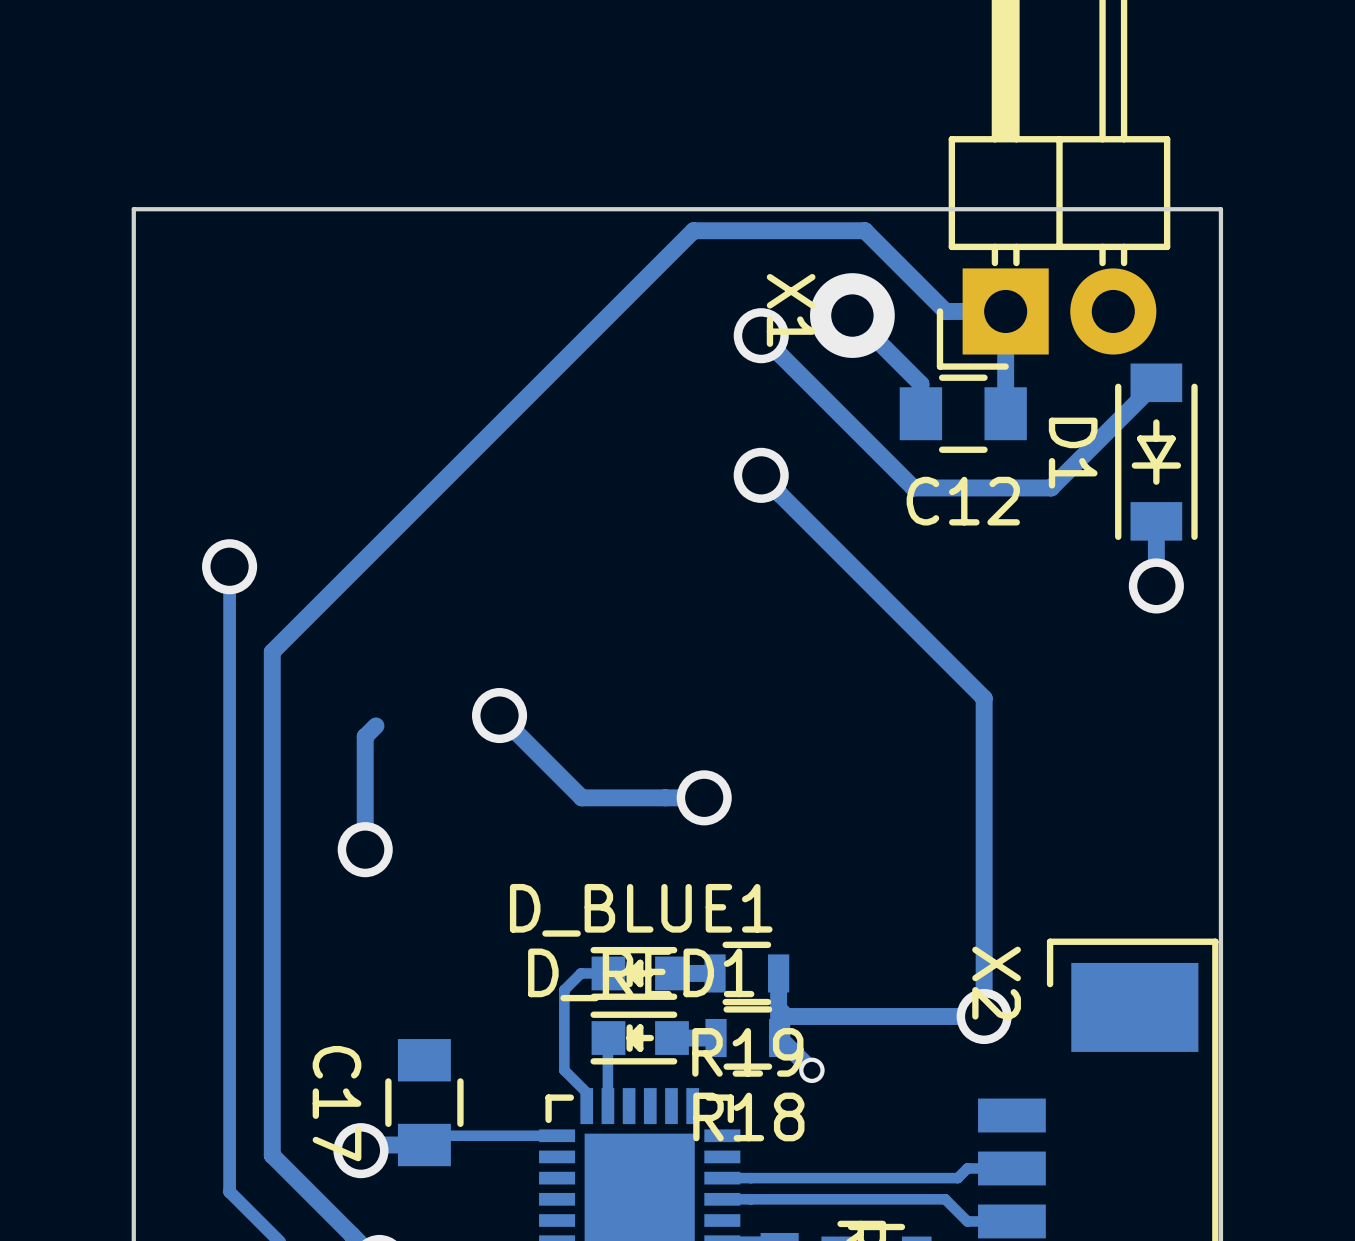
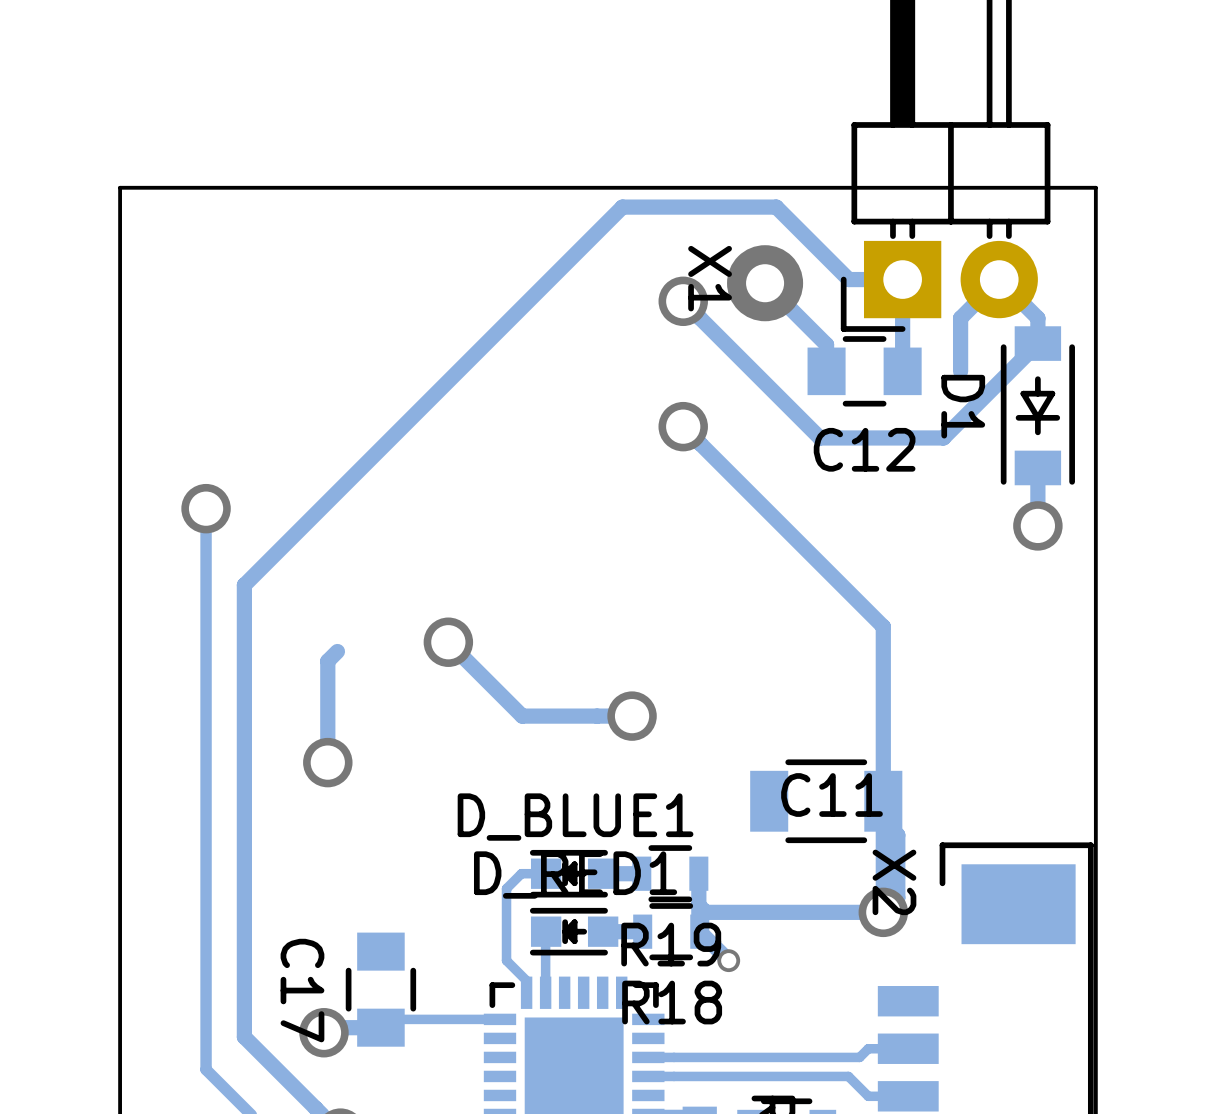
track: none -> (1037, 343) (1037, 318) (999, 279) (960, 318) (960, 371)
C11: none -> (826, 801)
track: none -> (883, 820) (897, 835) (897, 897) (883, 912)

